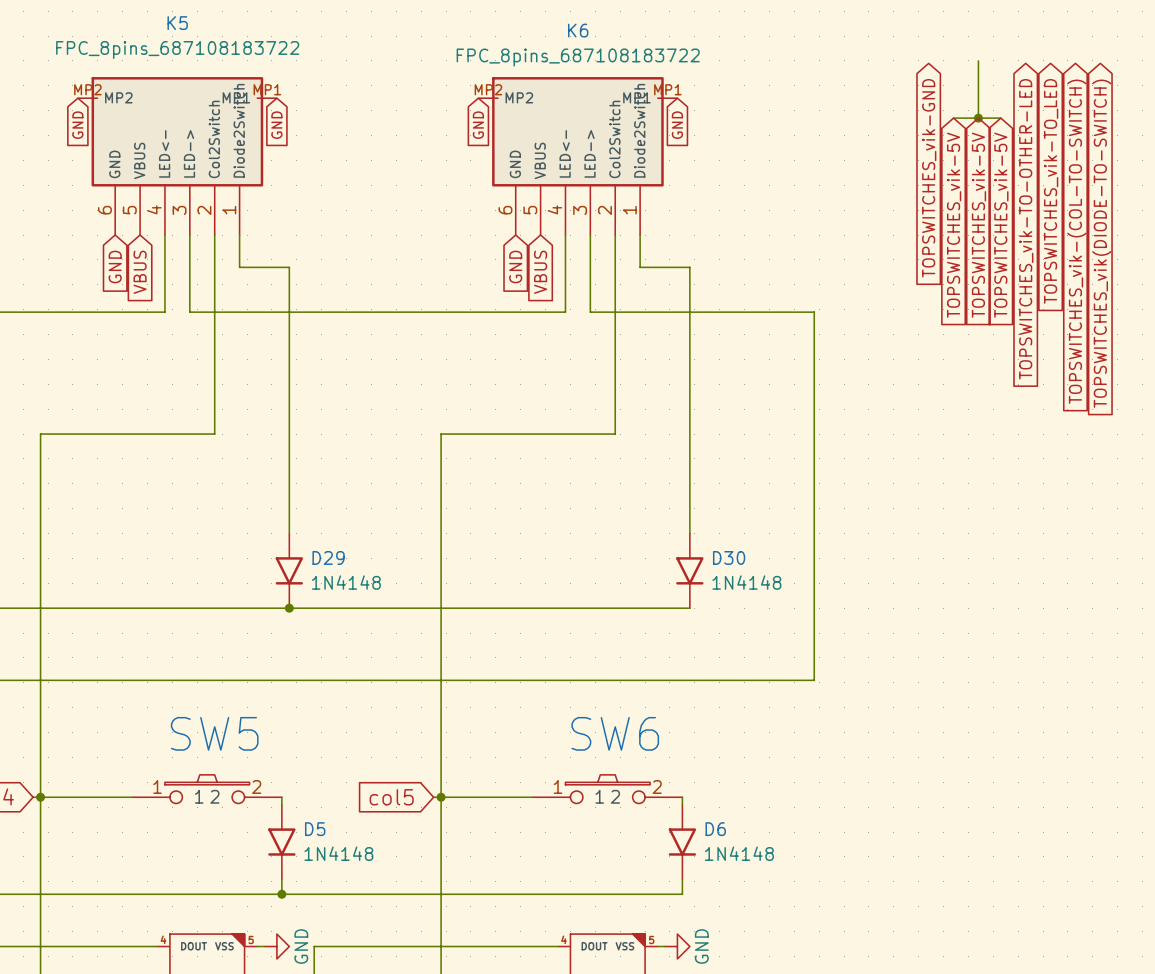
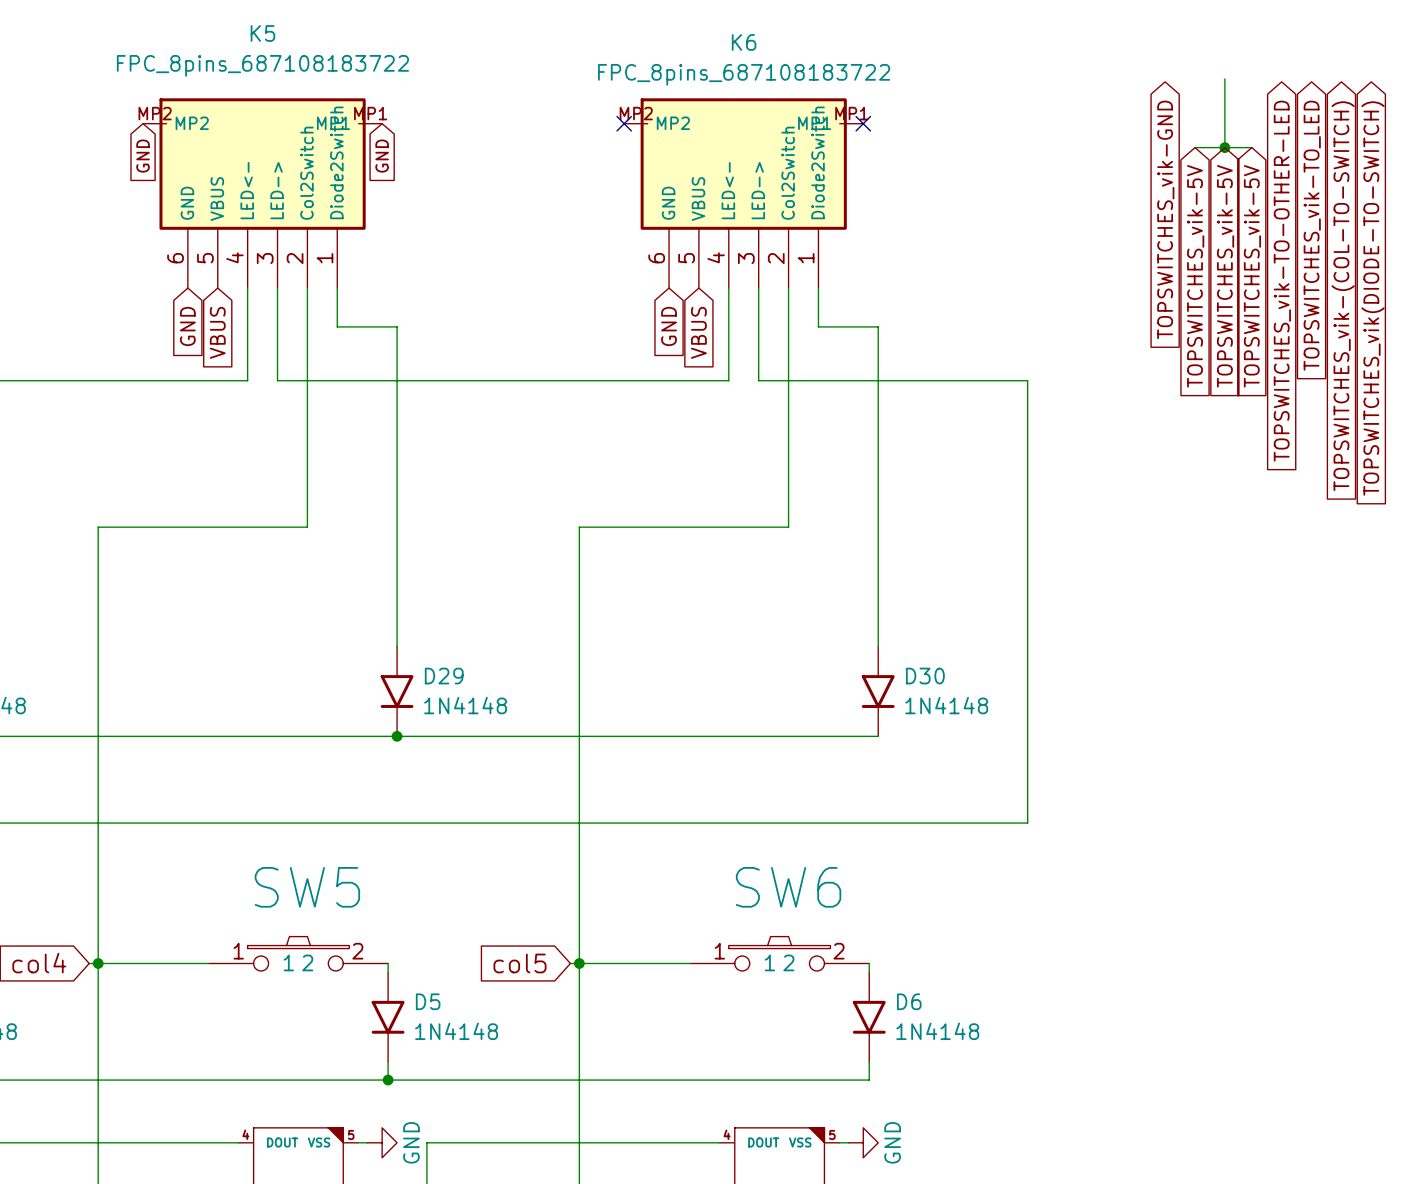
no-connect mark: none -> (624, 123)
no-connect mark: none -> (863, 123)
global label: GND (478, 125) -> none
global label: GND (677, 125) -> none

